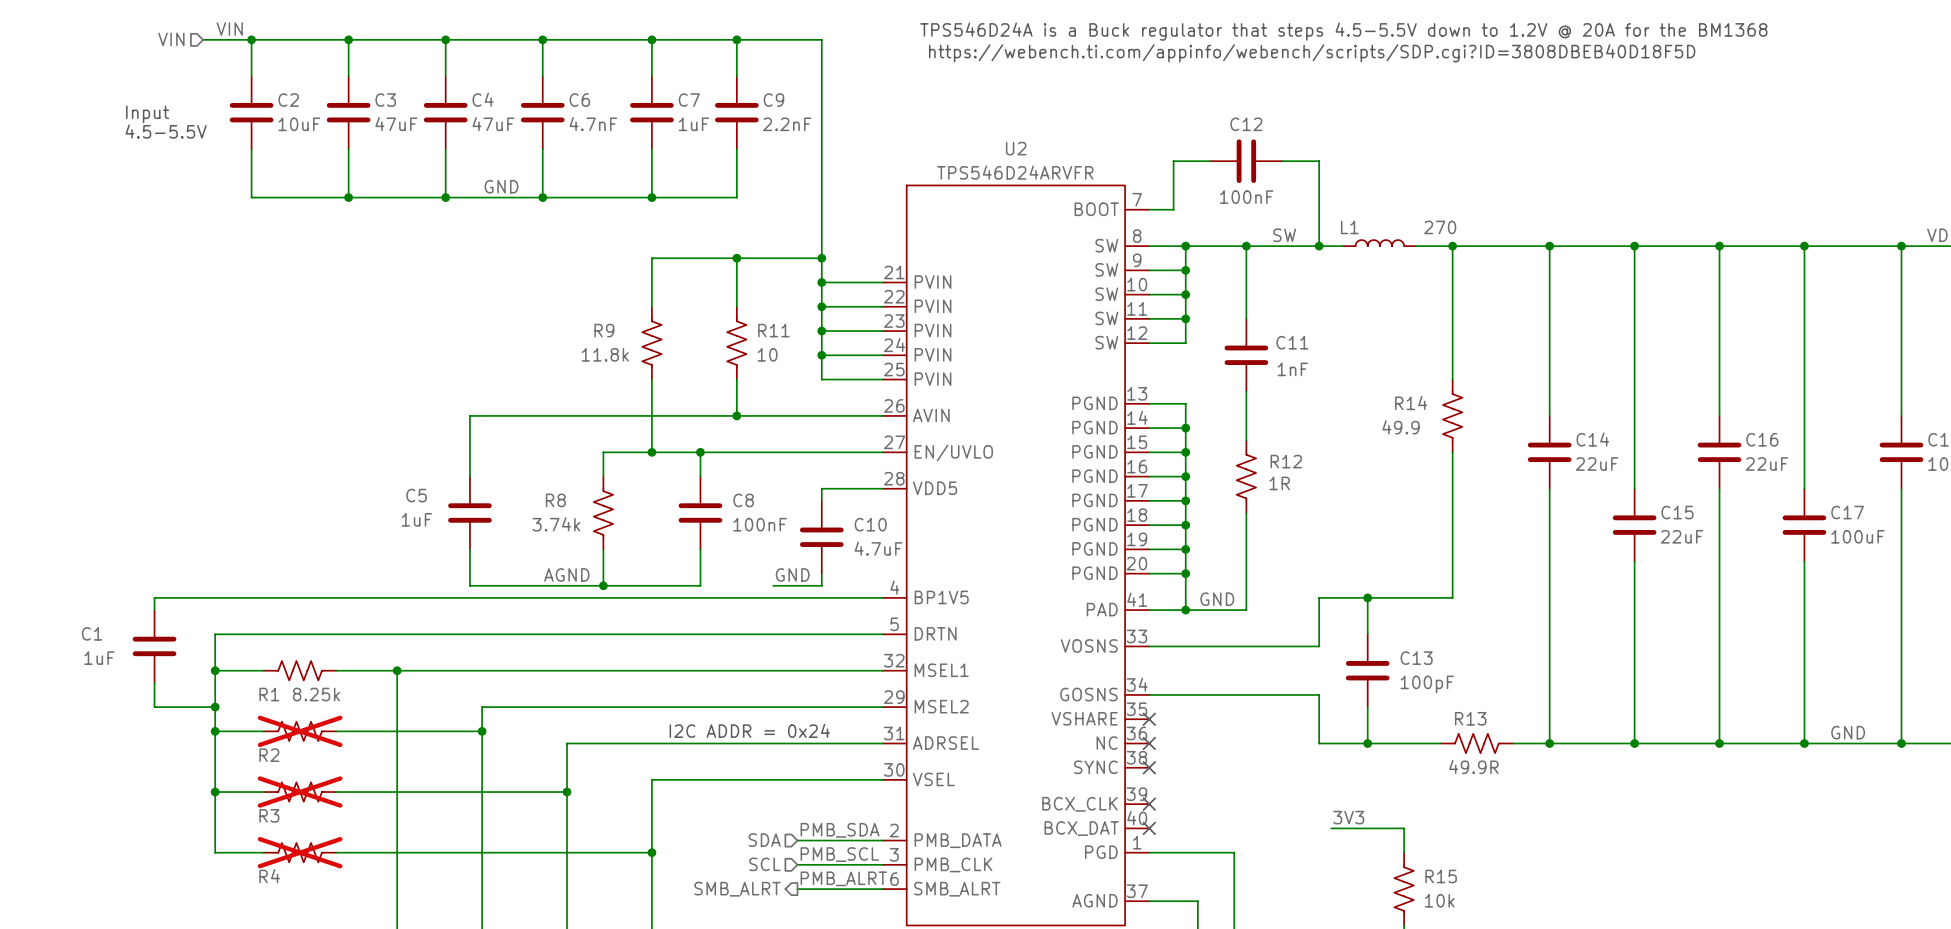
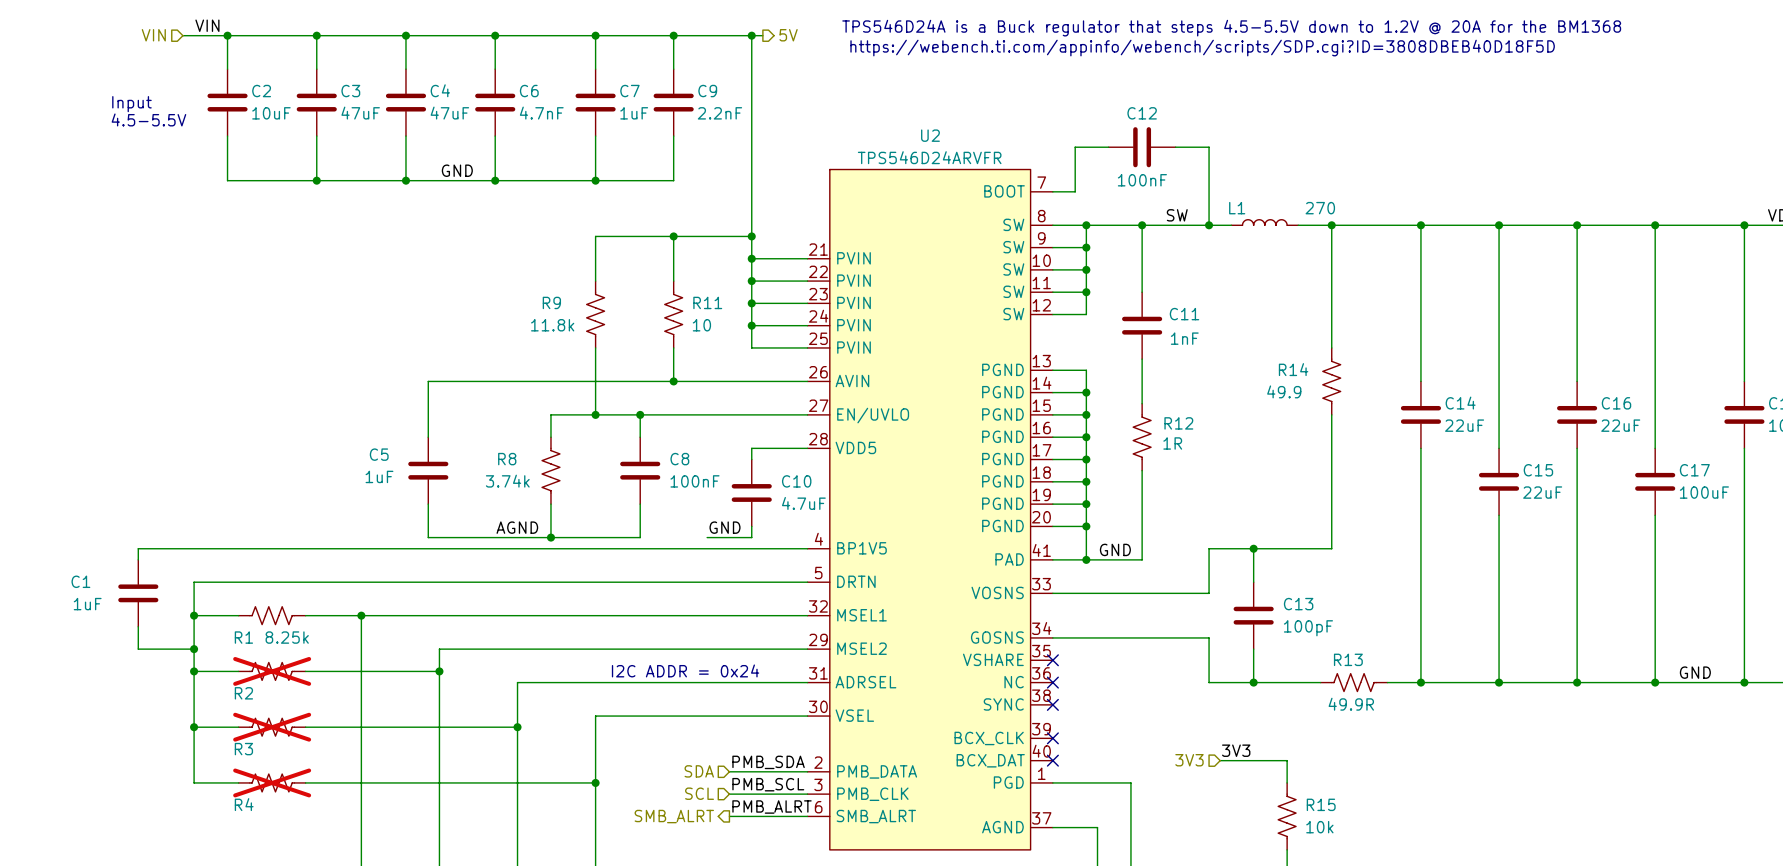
wire: none -> (751, 35) (762, 35)
junction: none -> (751, 35)
hierarchical label: none -> 5V (788, 35)
hierarchical label: none -> 3V3 (1189, 760)

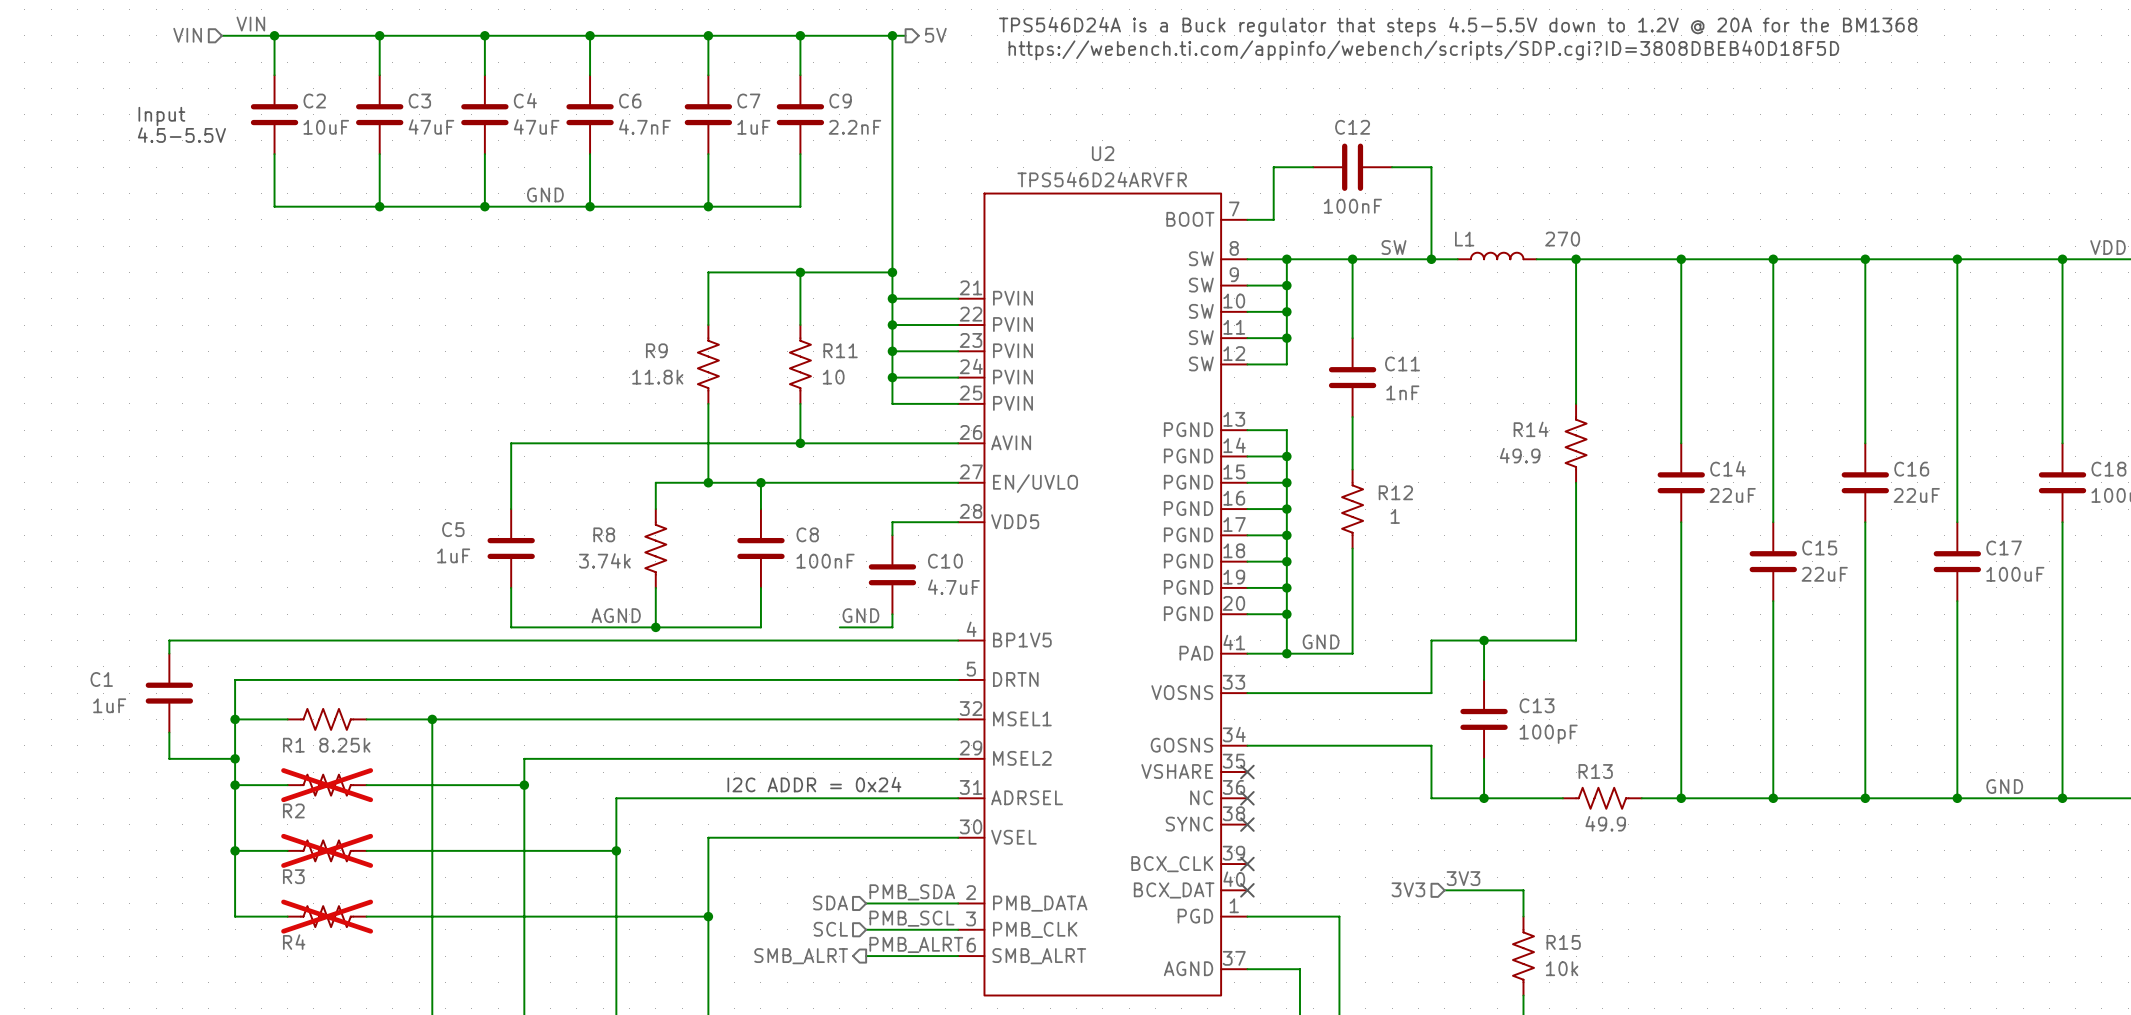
R12 value: 1R (1172, 443) -> 1 (1395, 516)
R13 value: 49.9R (1351, 704) -> 49.9 (1605, 823)

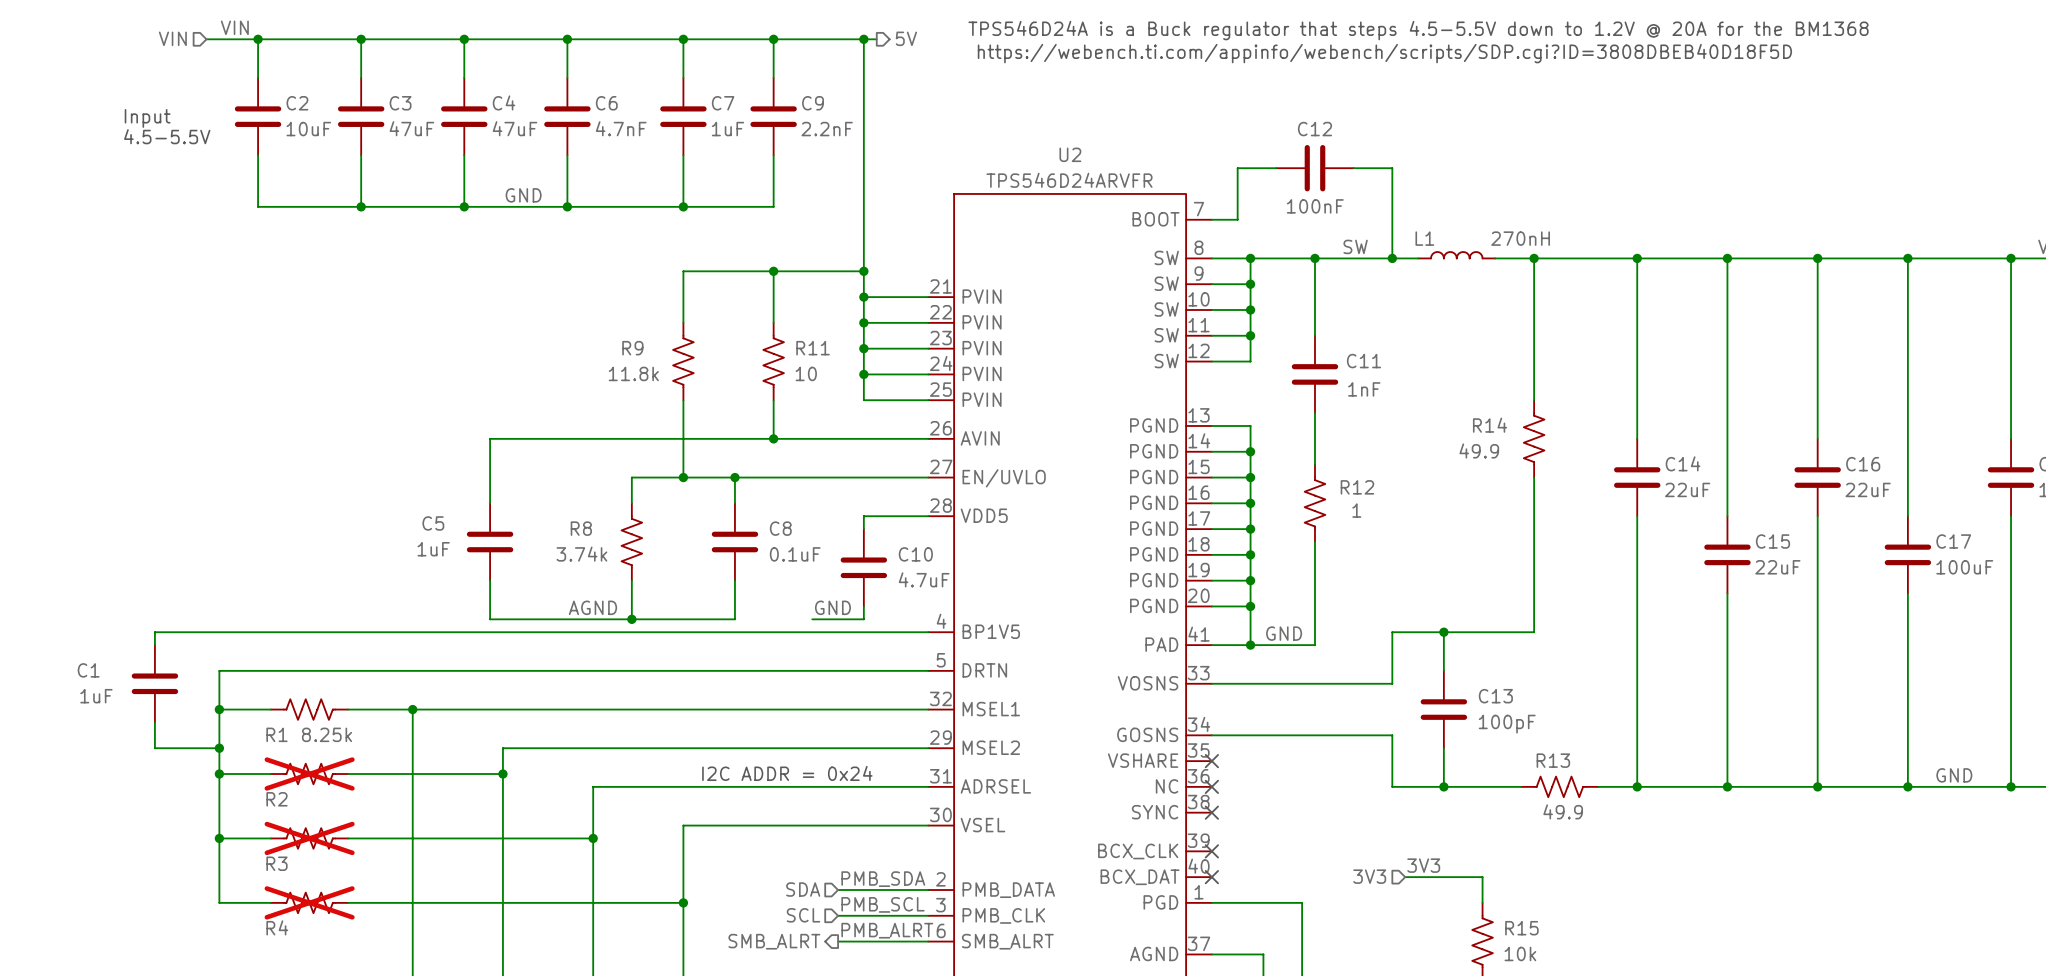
L1 value: 270 (1562, 239) -> 270nH (1520, 238)
C8 value: 100nF (825, 561) -> 0.1uF (795, 554)

